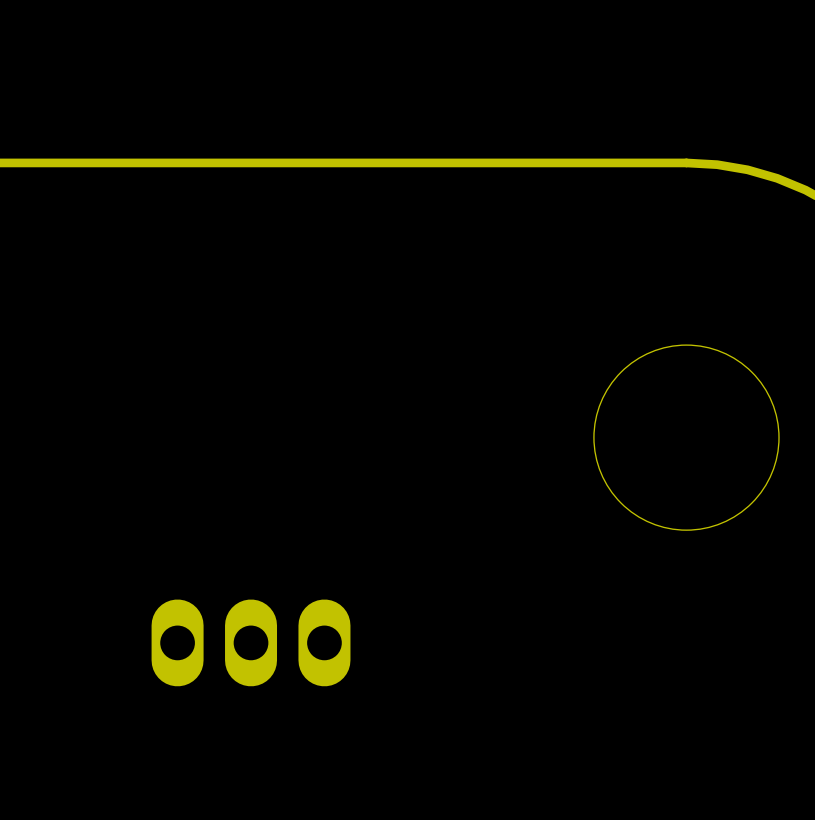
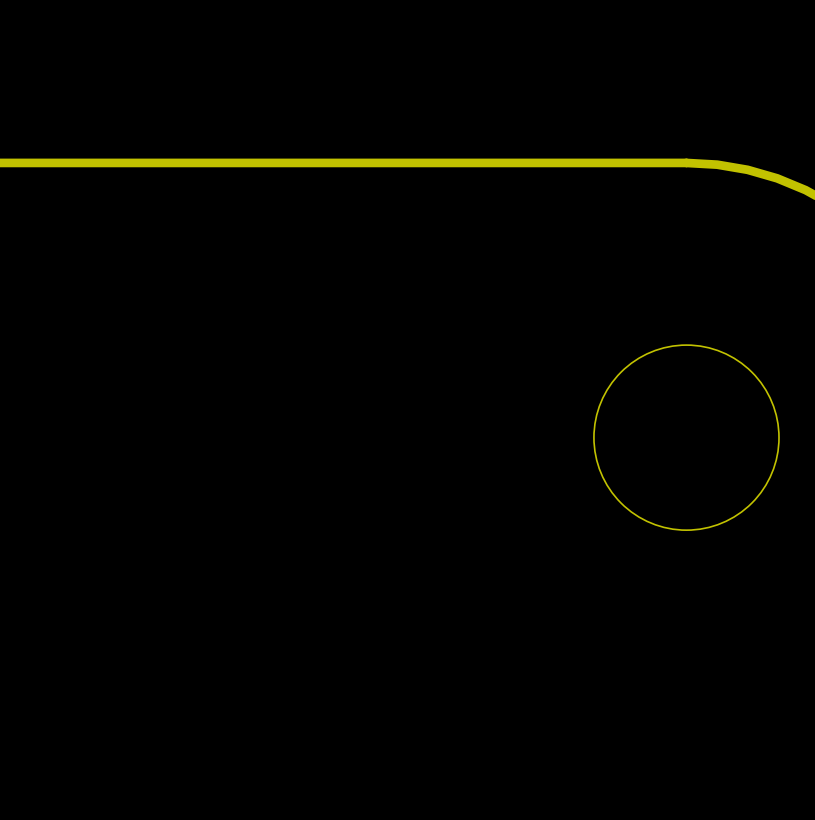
part: (251, 642) -> none

